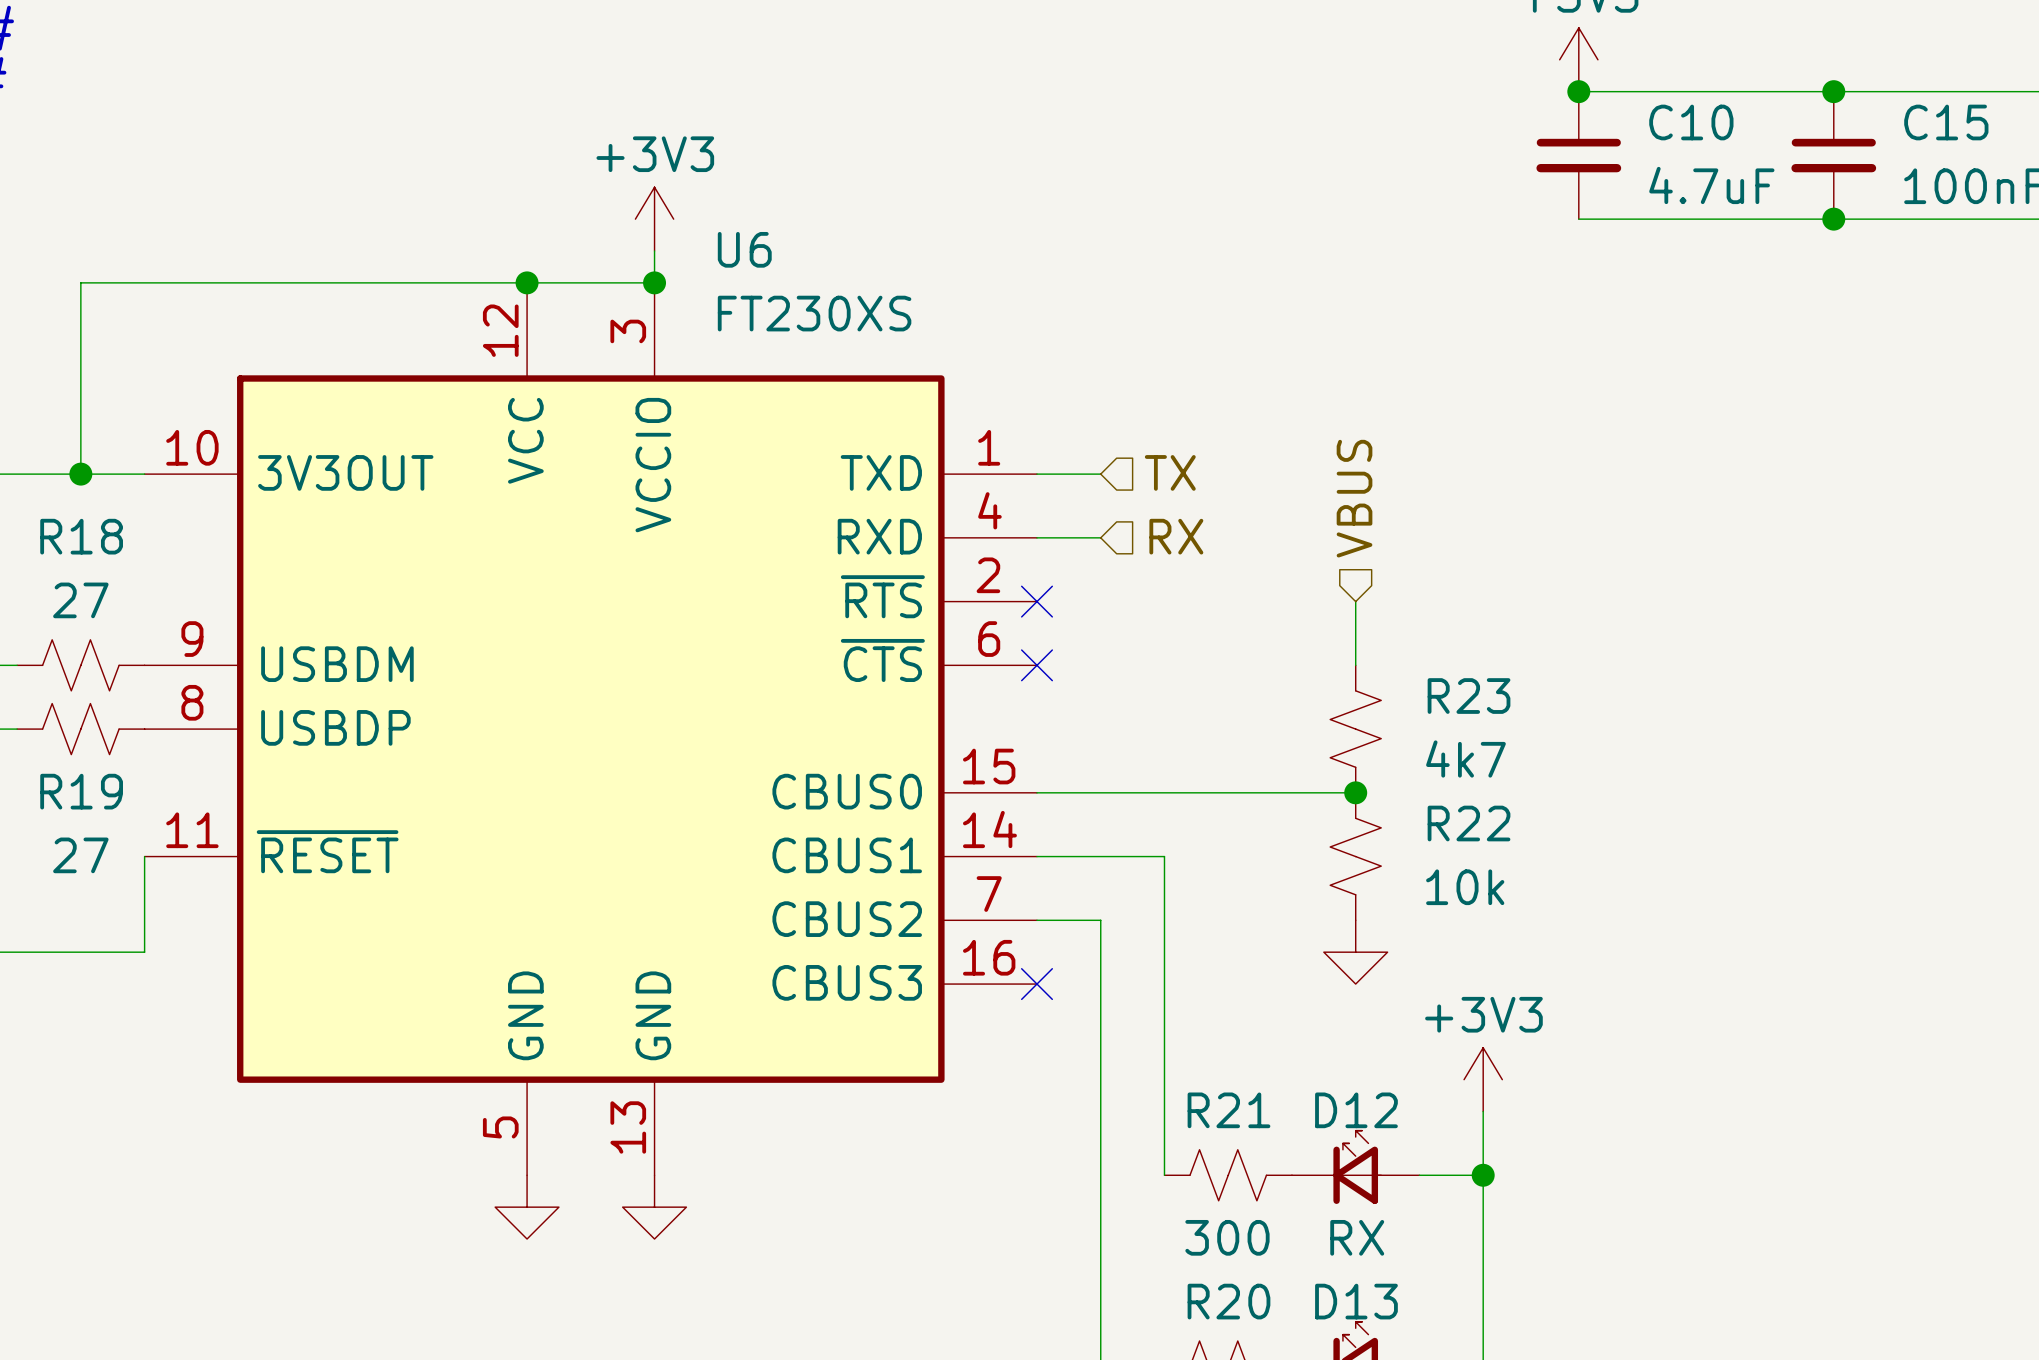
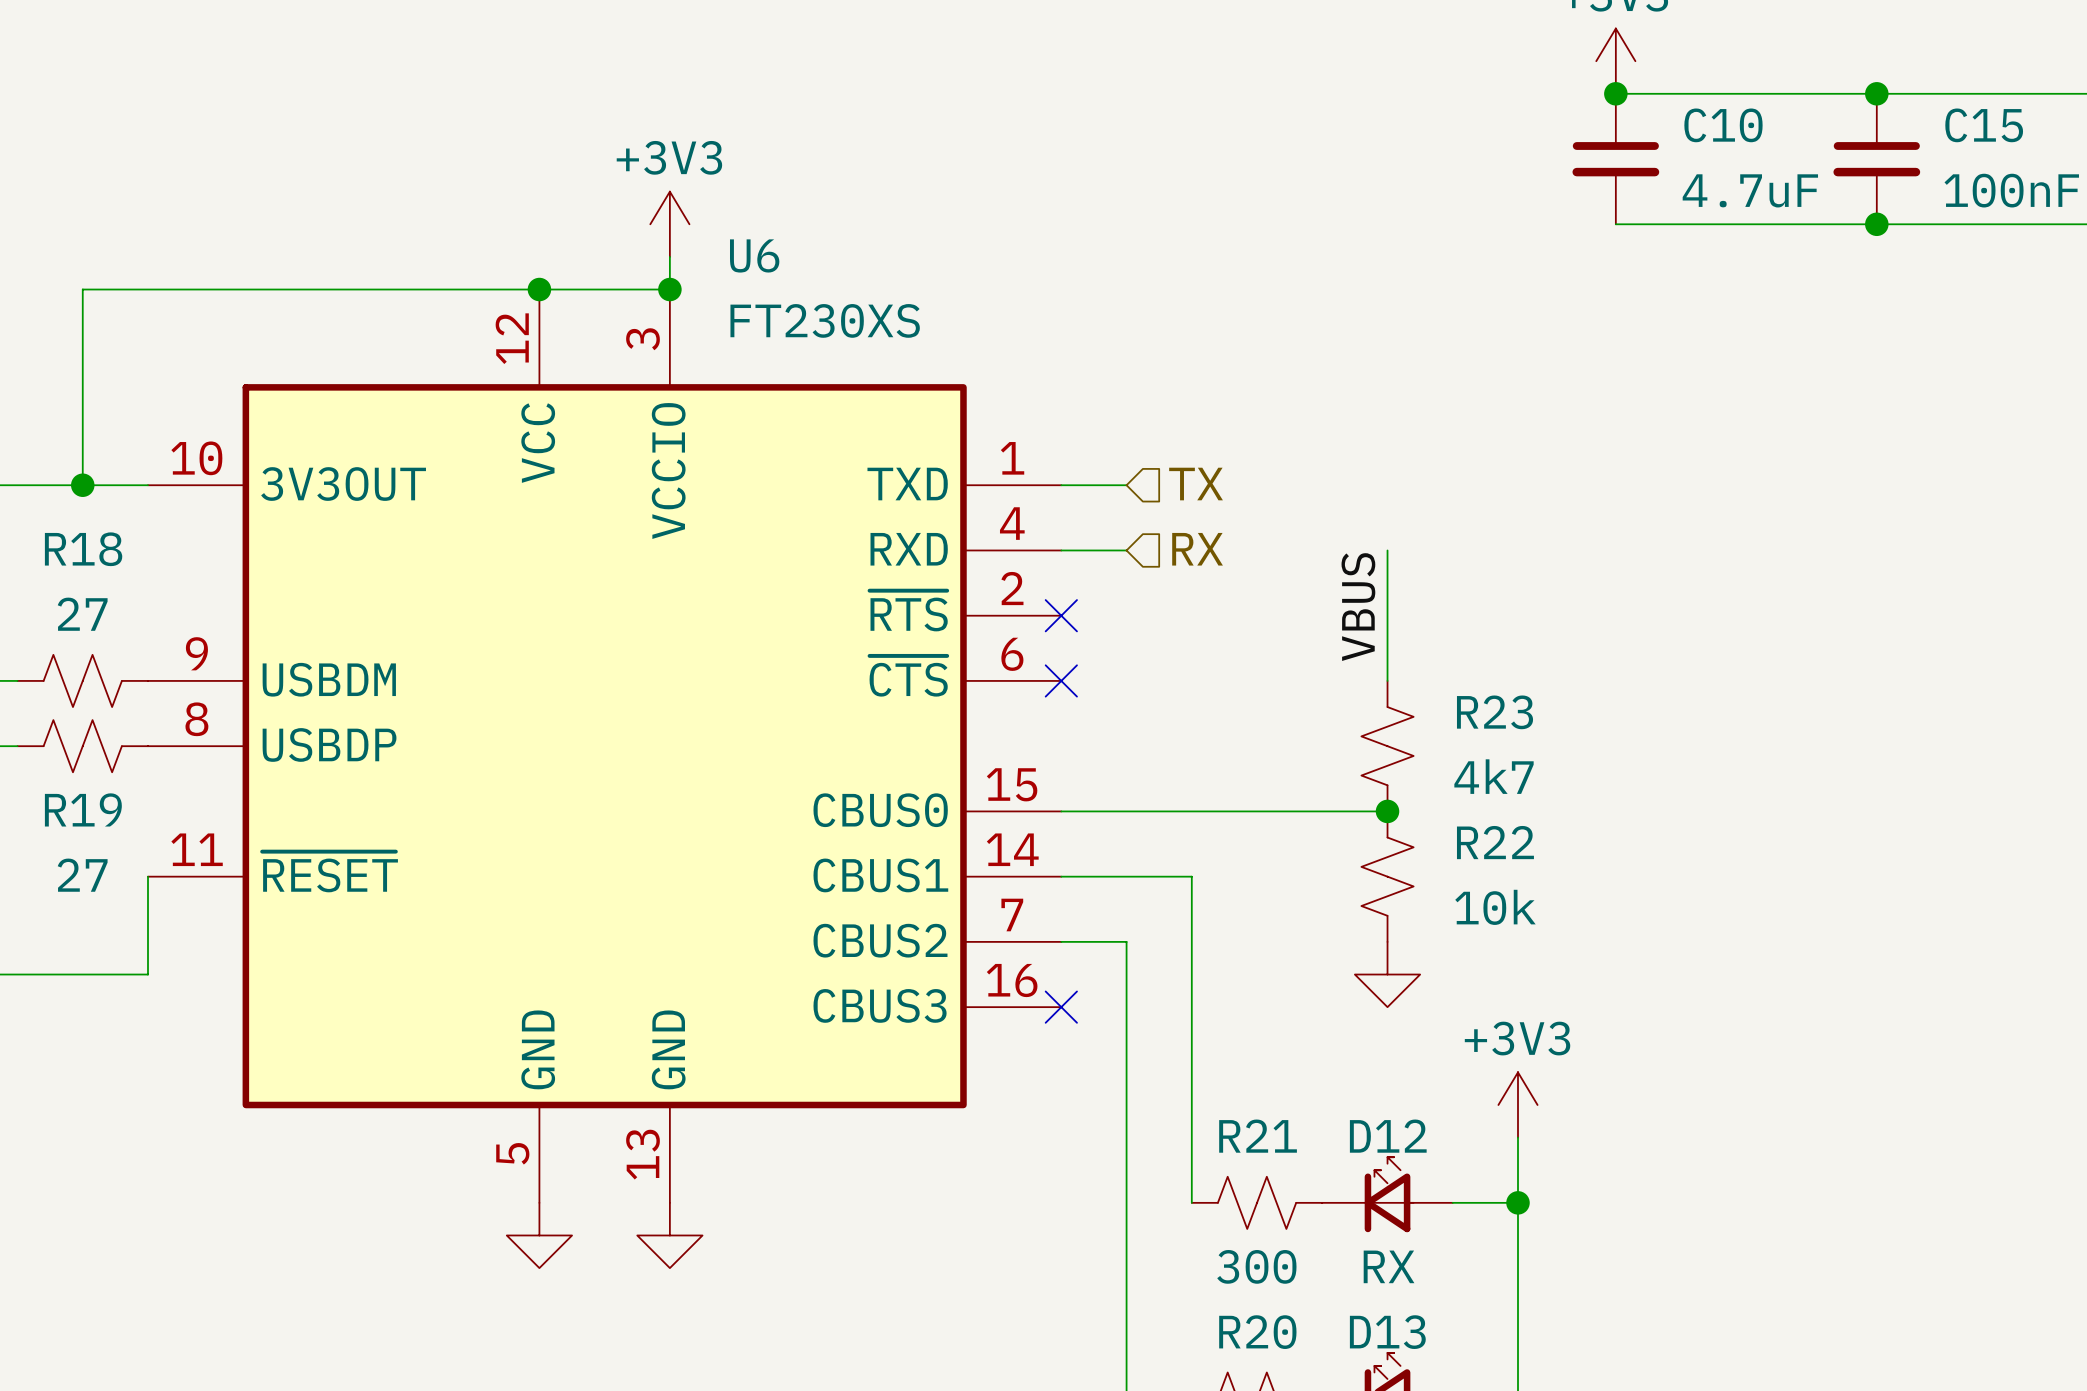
hierarchical label: VBUS (1354, 498) -> none
wire: none -> (1387, 550) (1387, 615)
label: none -> VBUS (1358, 607)

